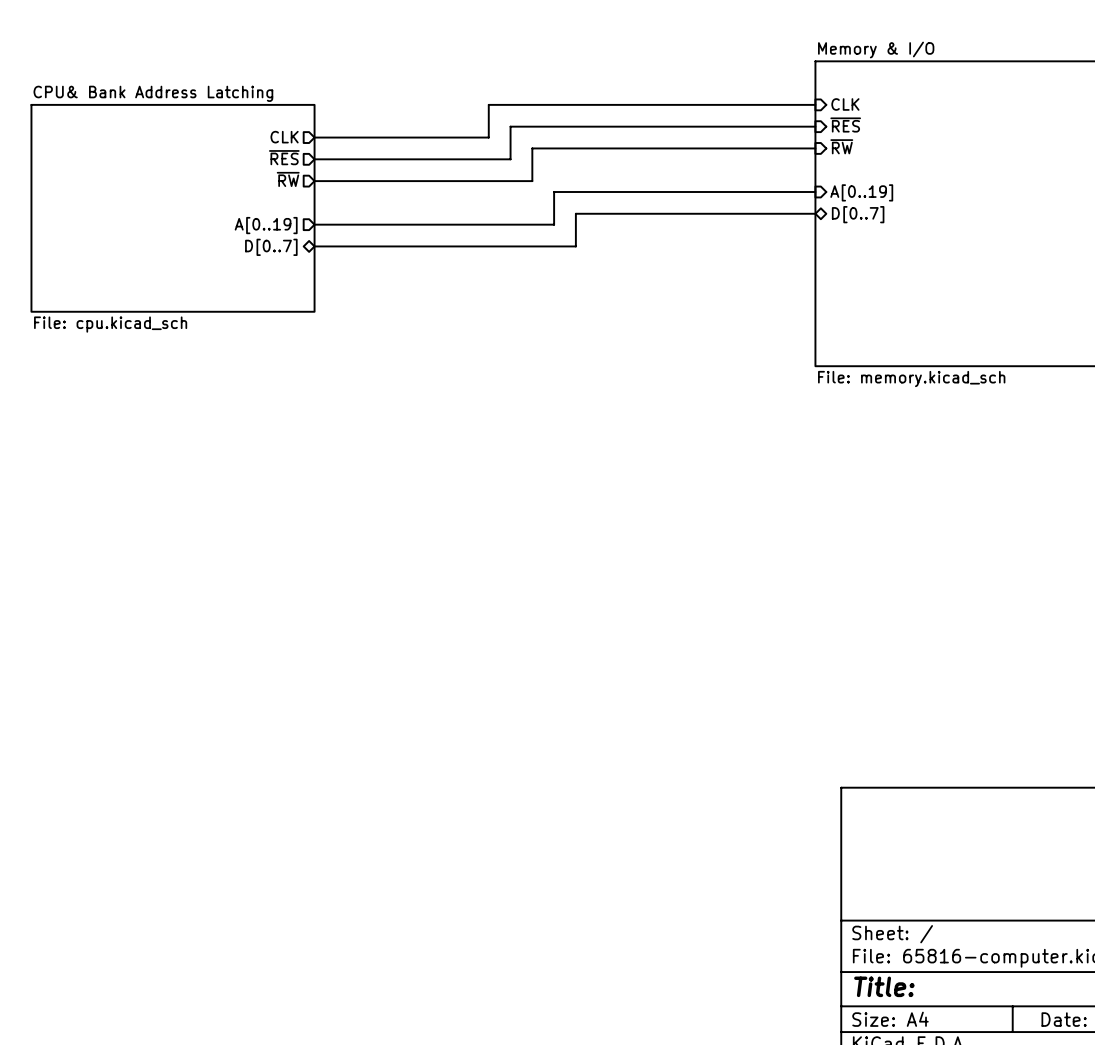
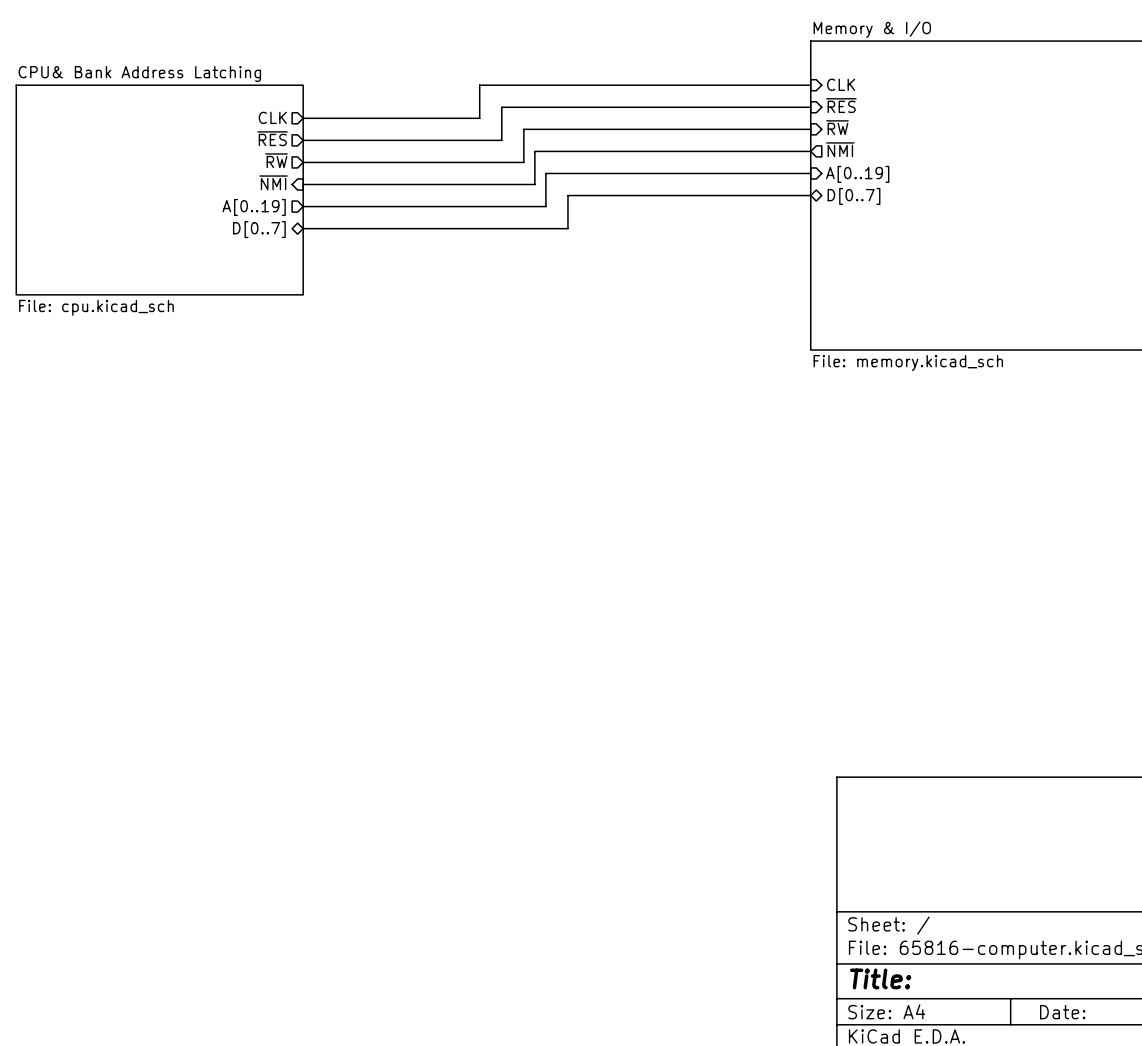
sheet pin: none -> ~{NMI} (840, 149)
wire: none -> (810, 151) (534, 151) (534, 184) (303, 184)
sheet pin: none -> ~{NMI} (273, 182)

